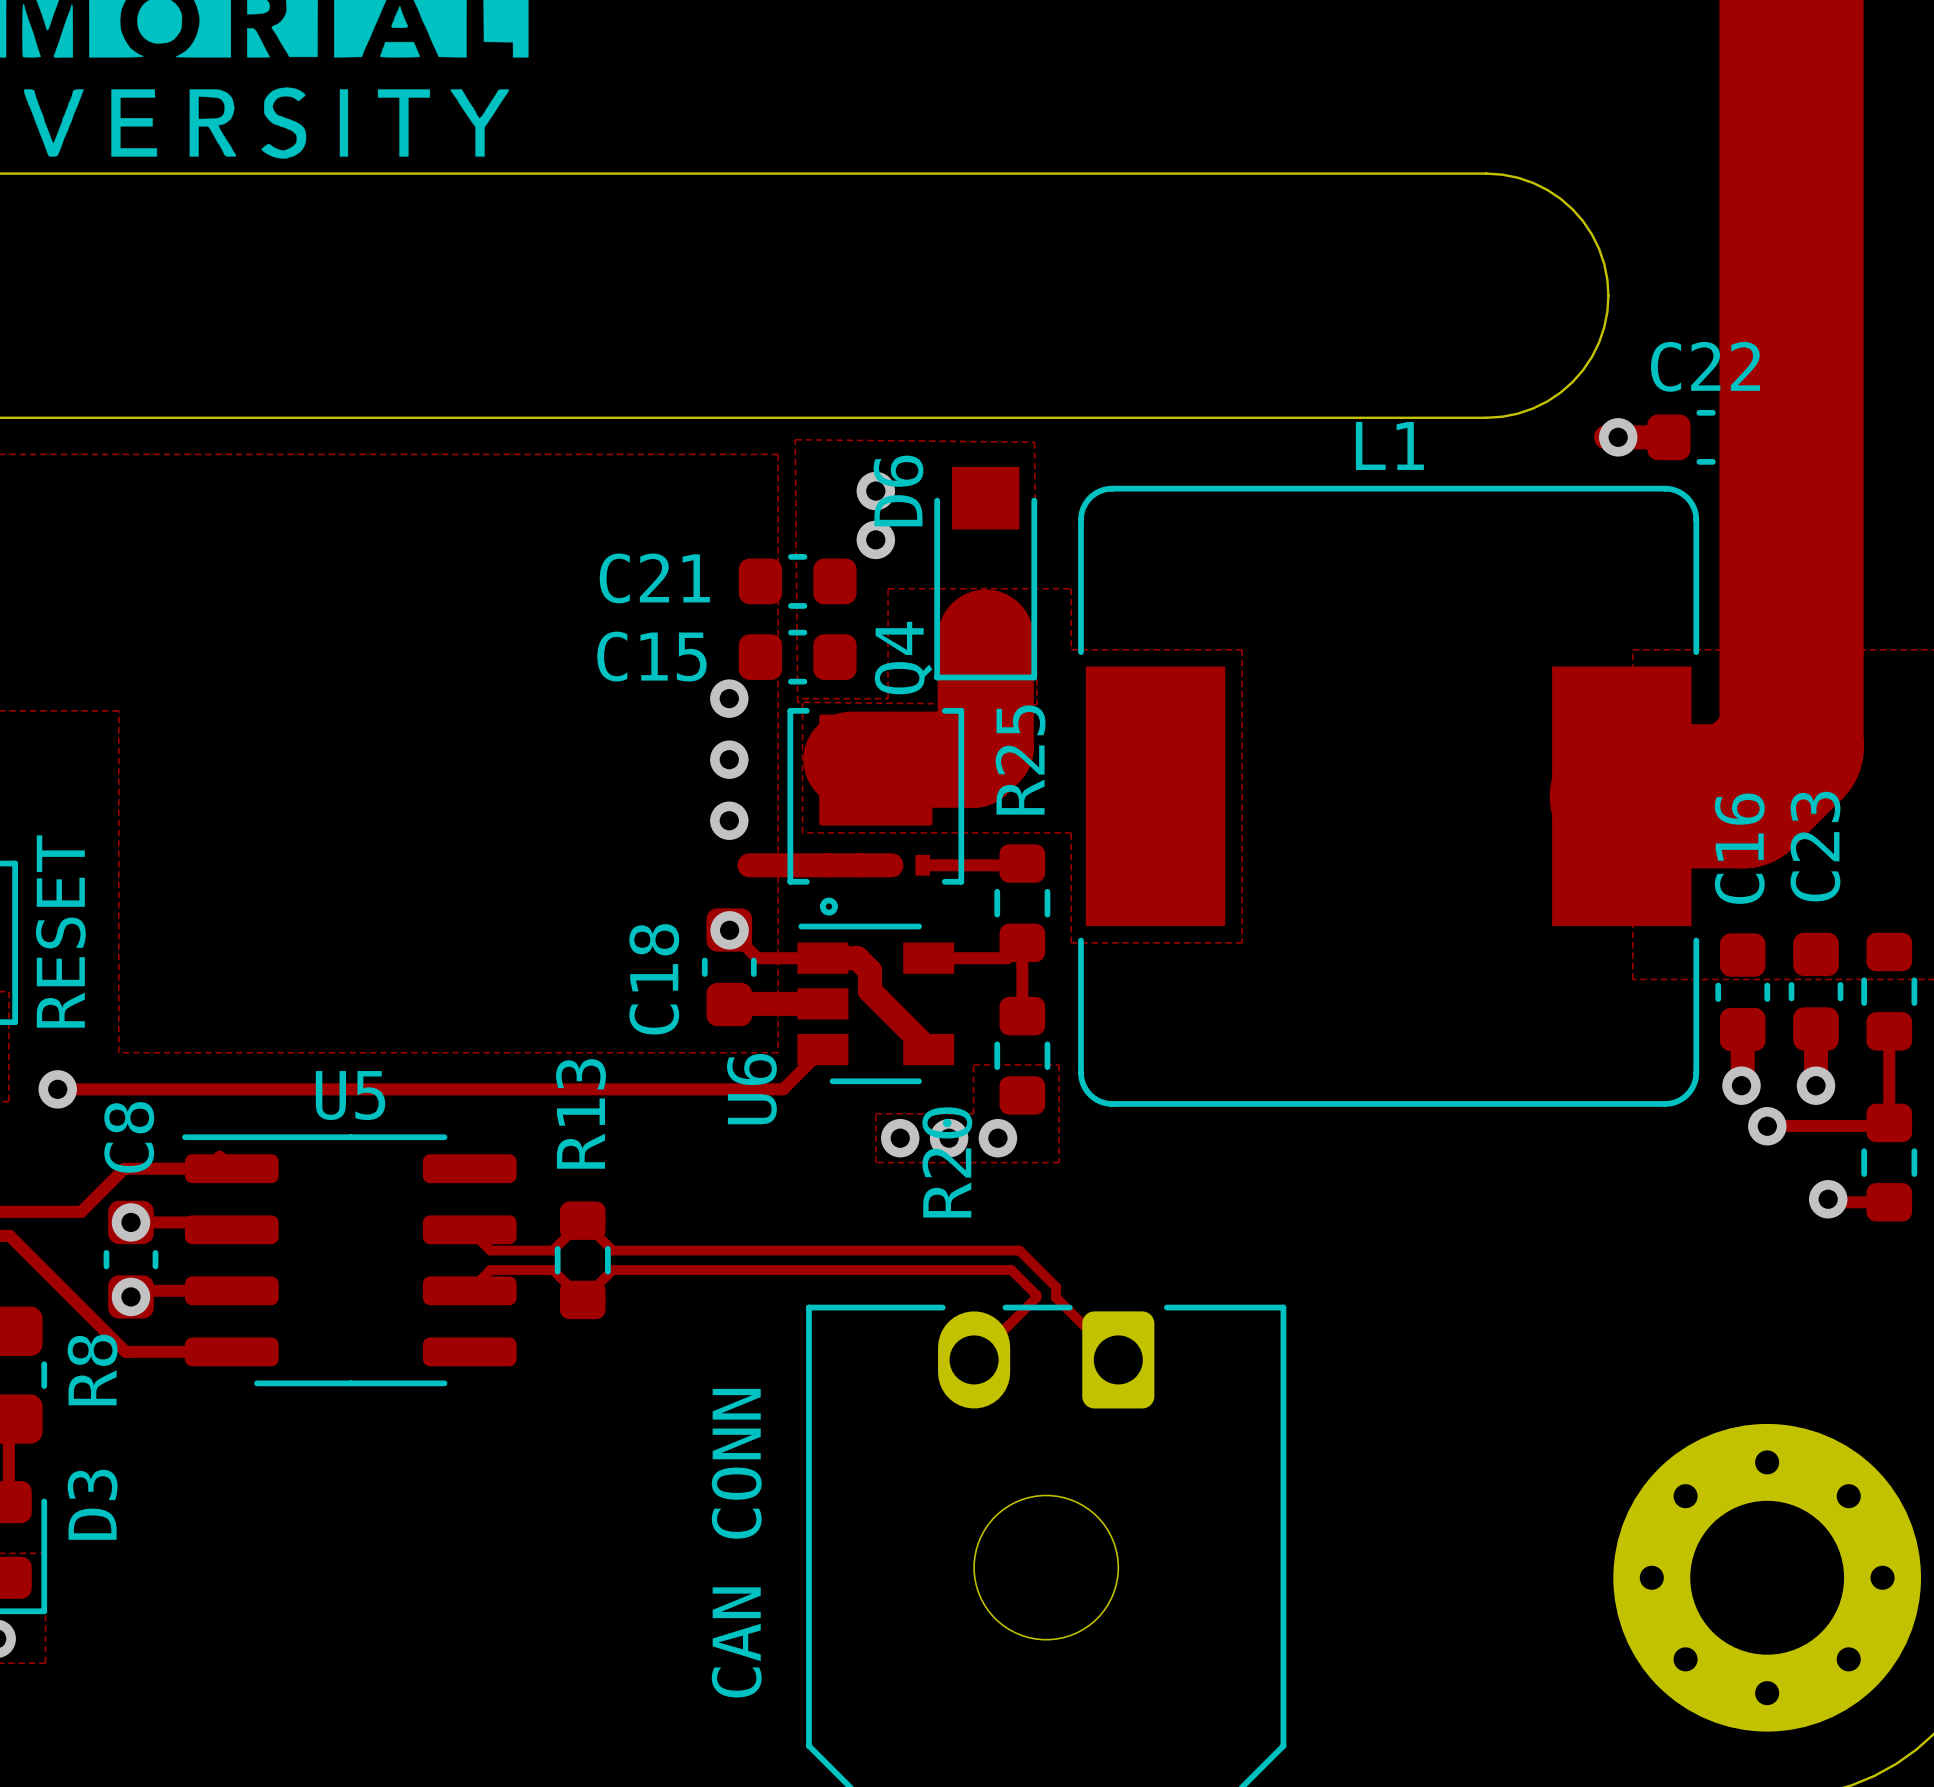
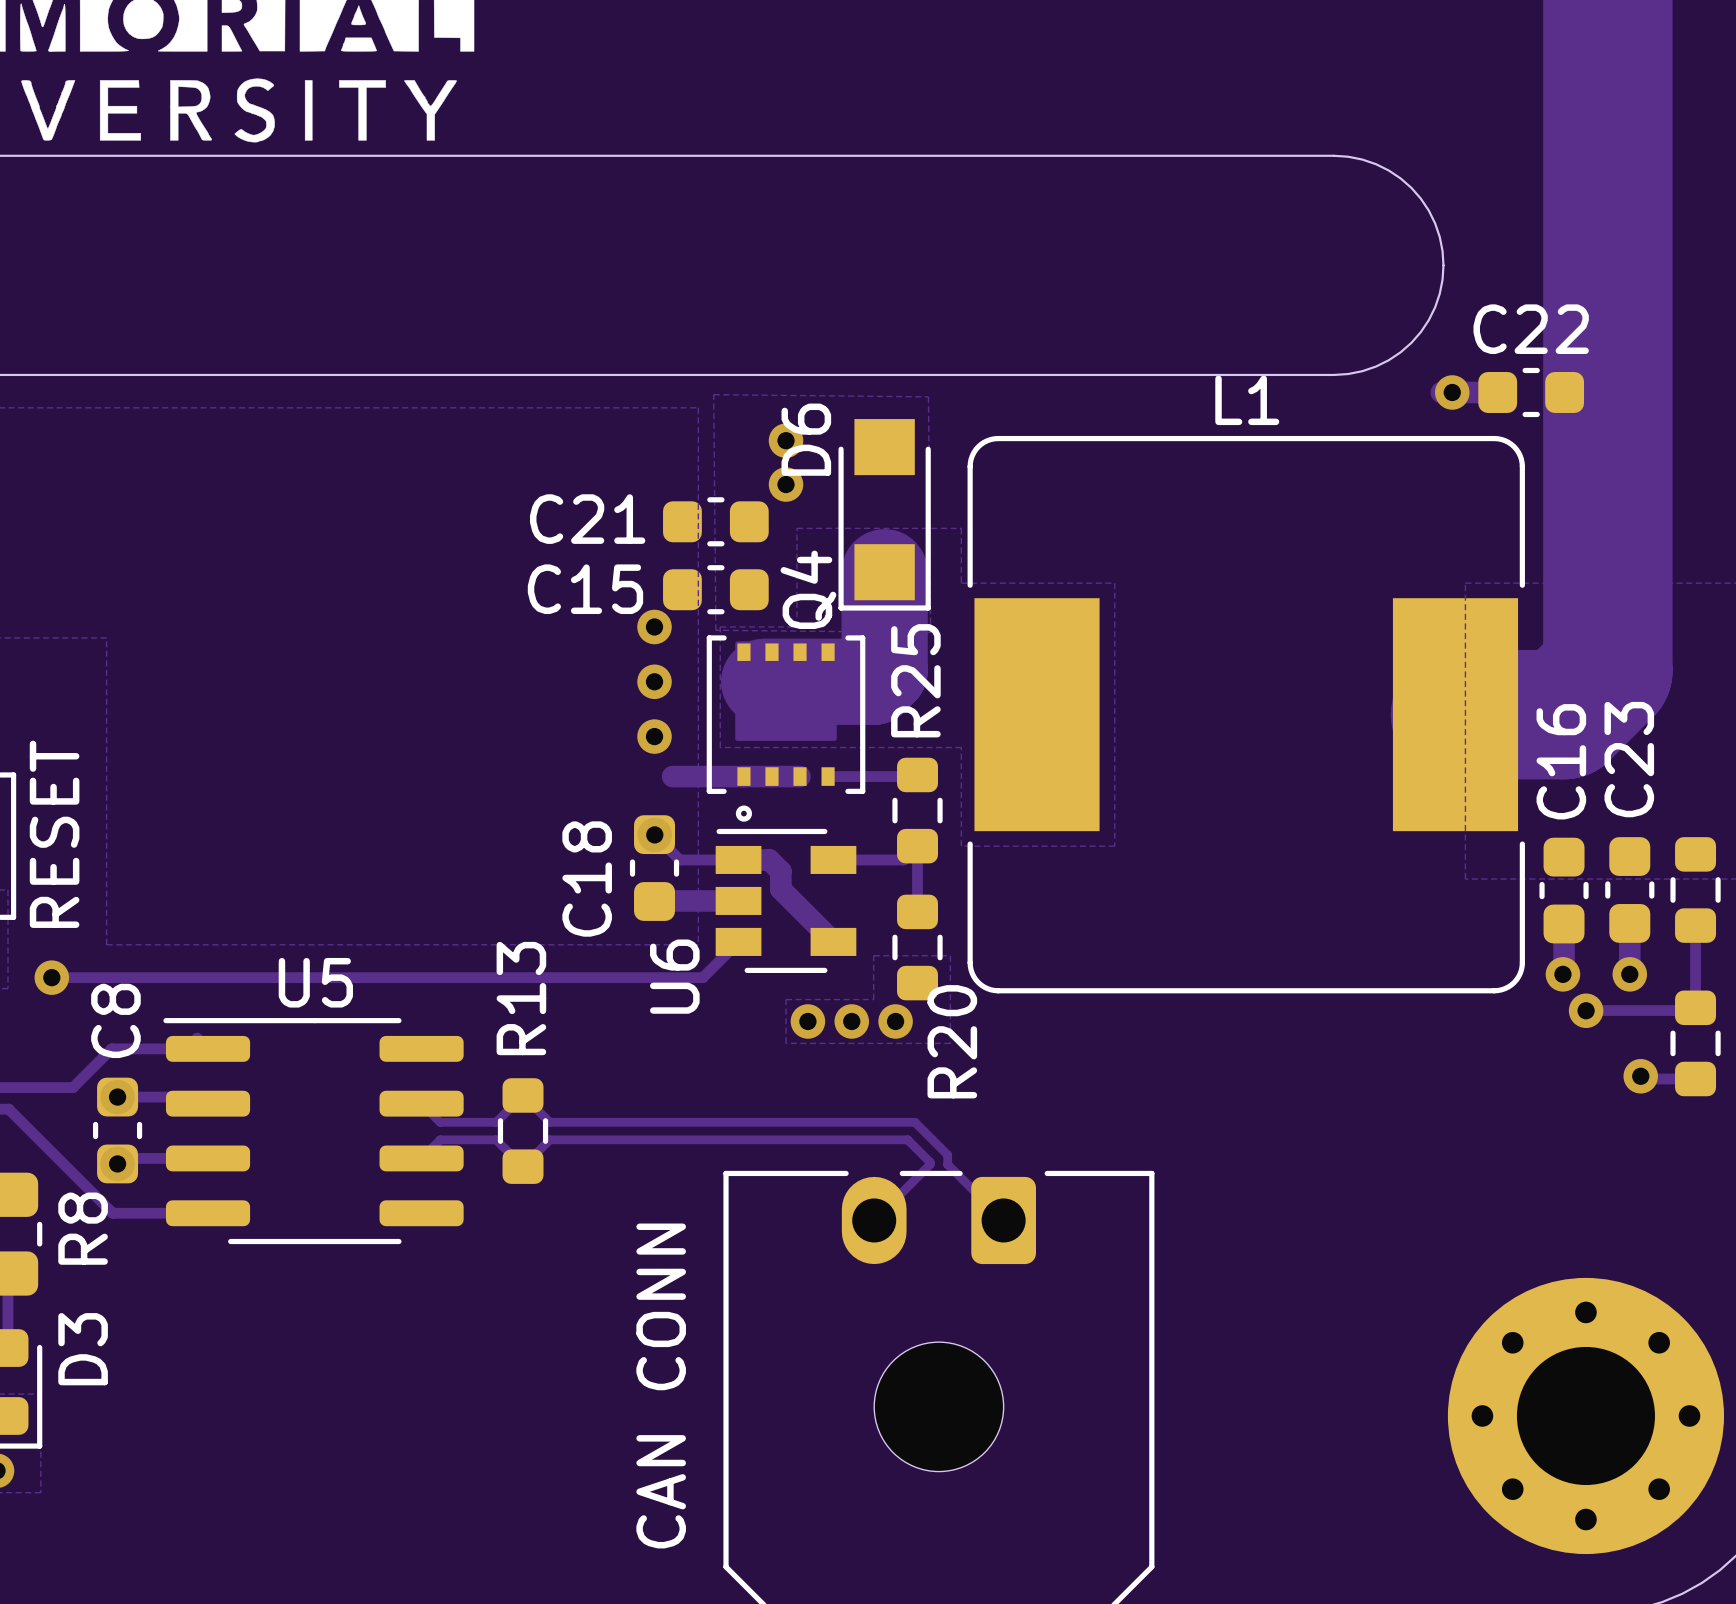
R20 name position: R20 (947, 1162) -> R20 (952, 1041)

